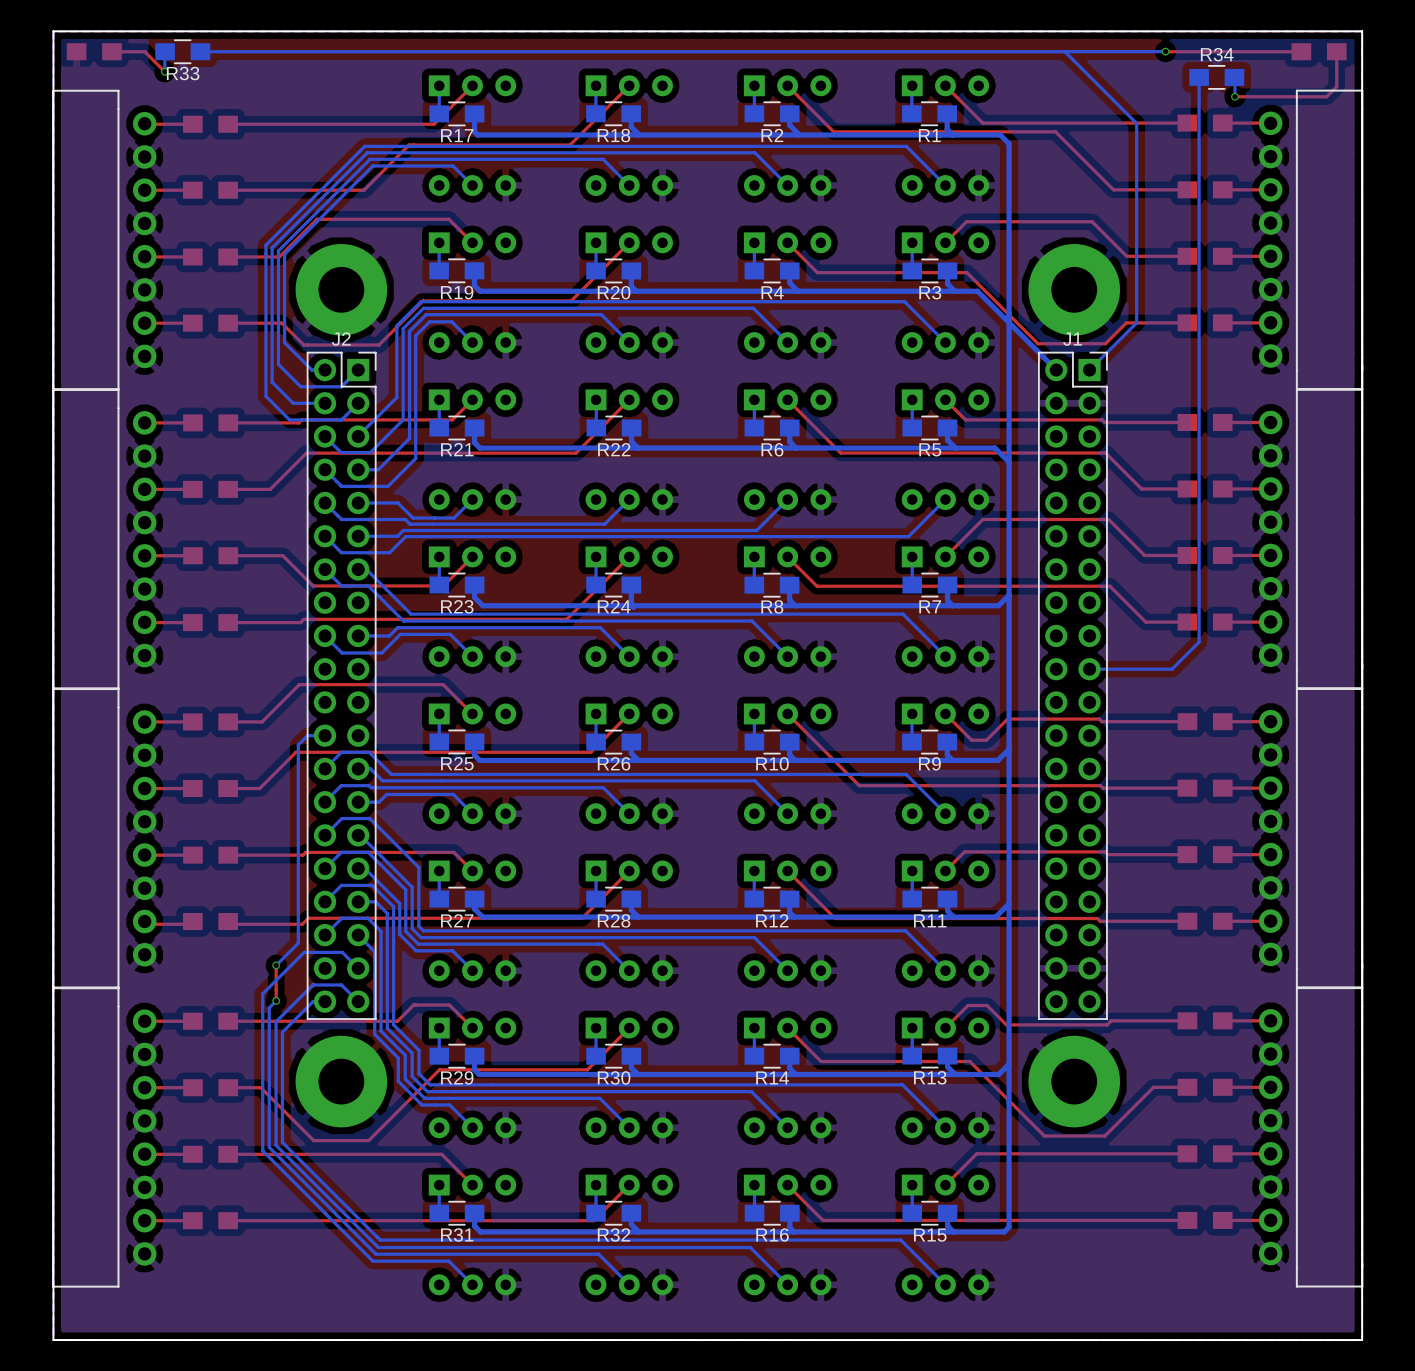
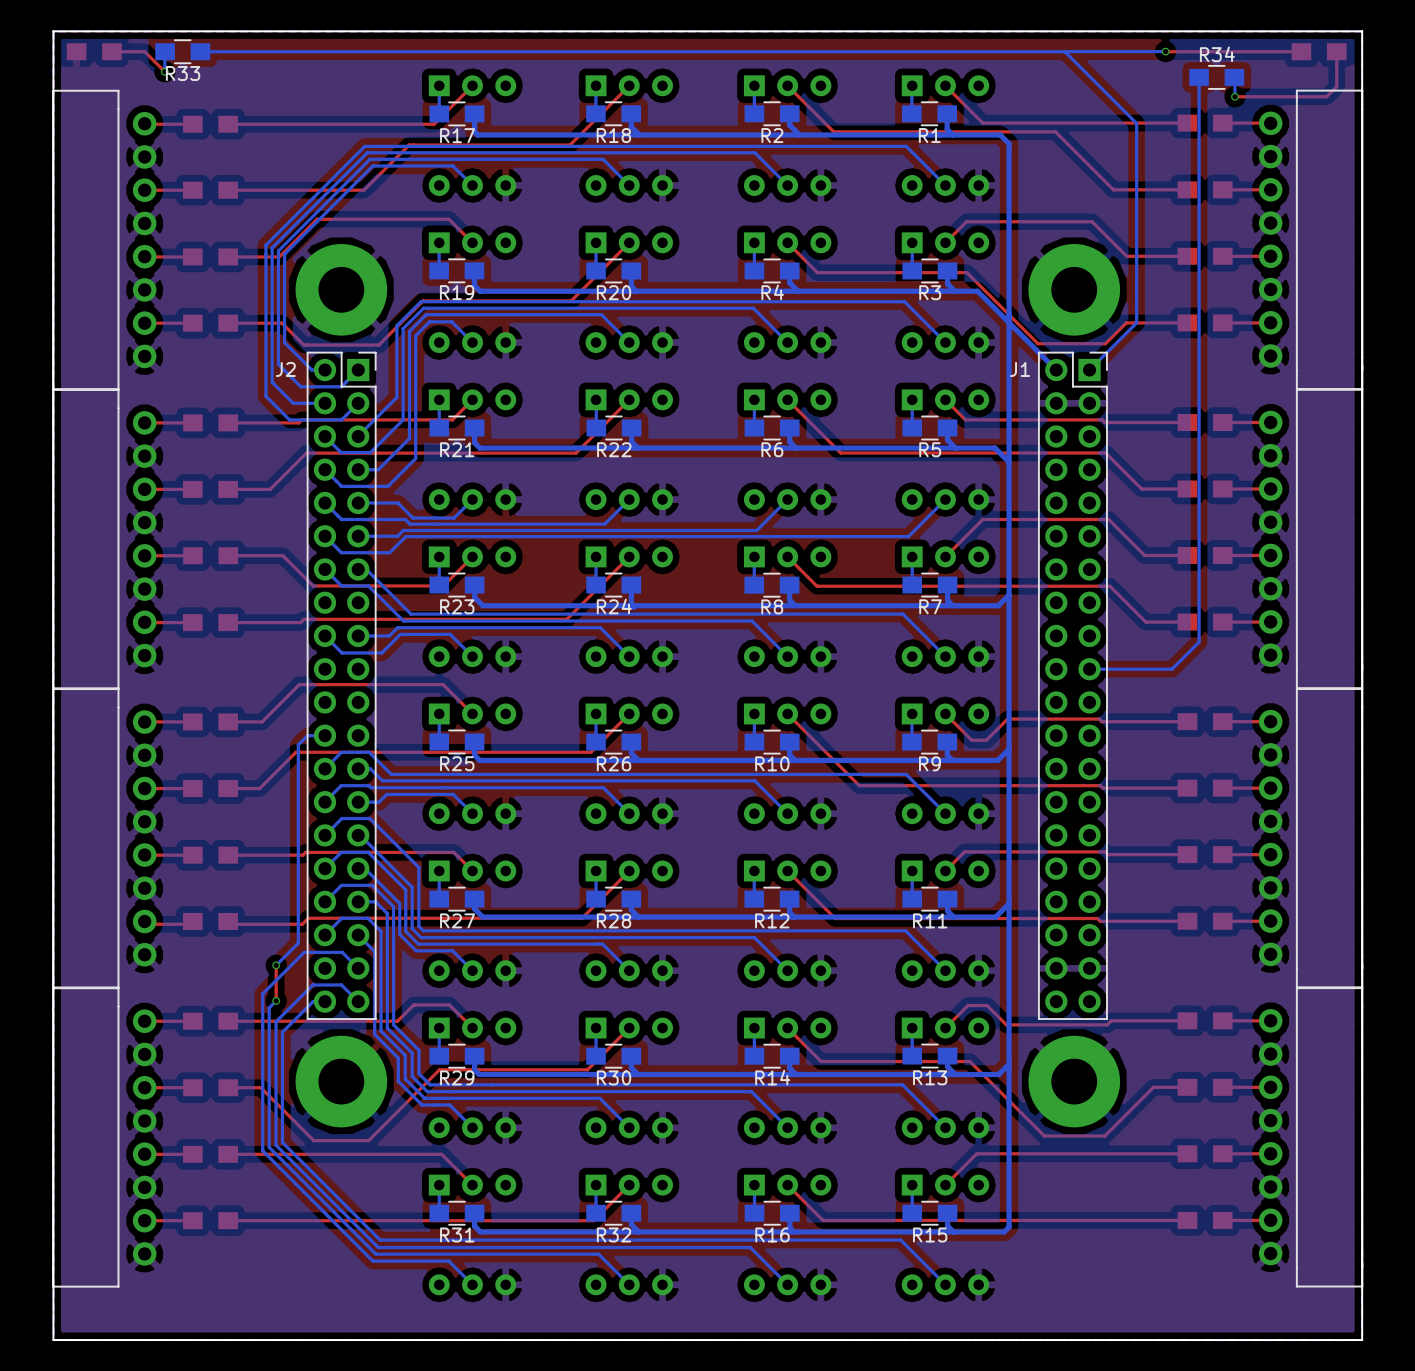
J2 name position: J2 (341, 339) -> J2 (285, 369)
J1 name position: J1 (1072, 339) -> J1 (1020, 369)

